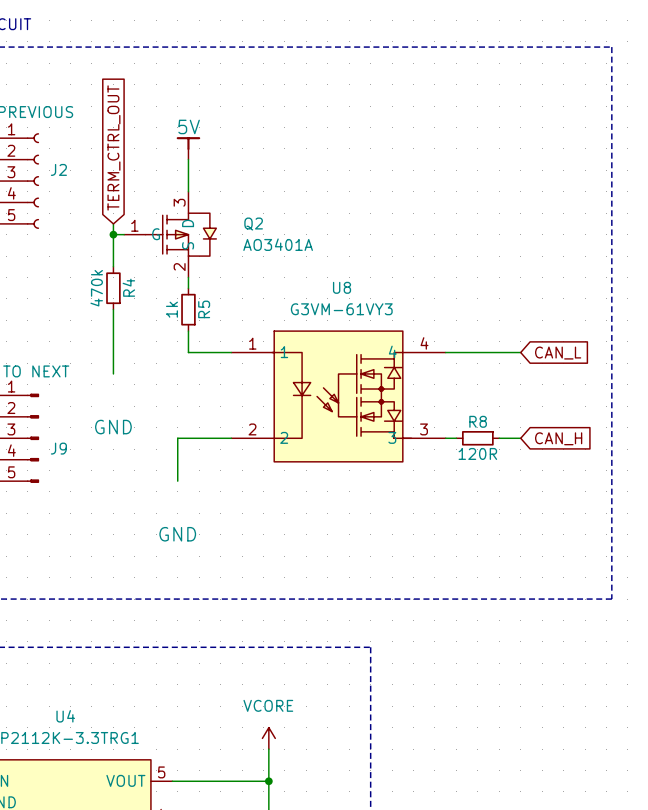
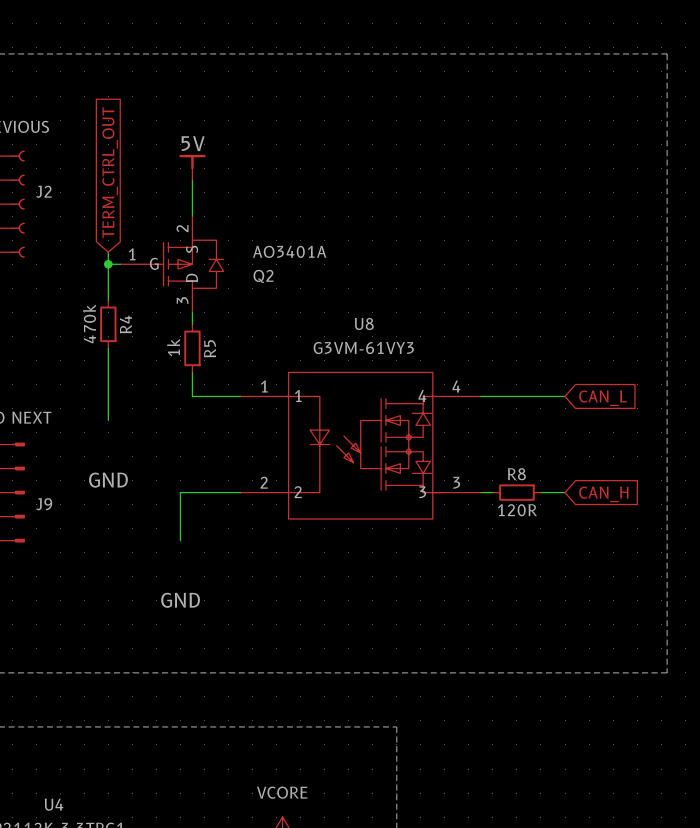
Q2 flip: as is (180, 234) -> up-down (184, 264)

